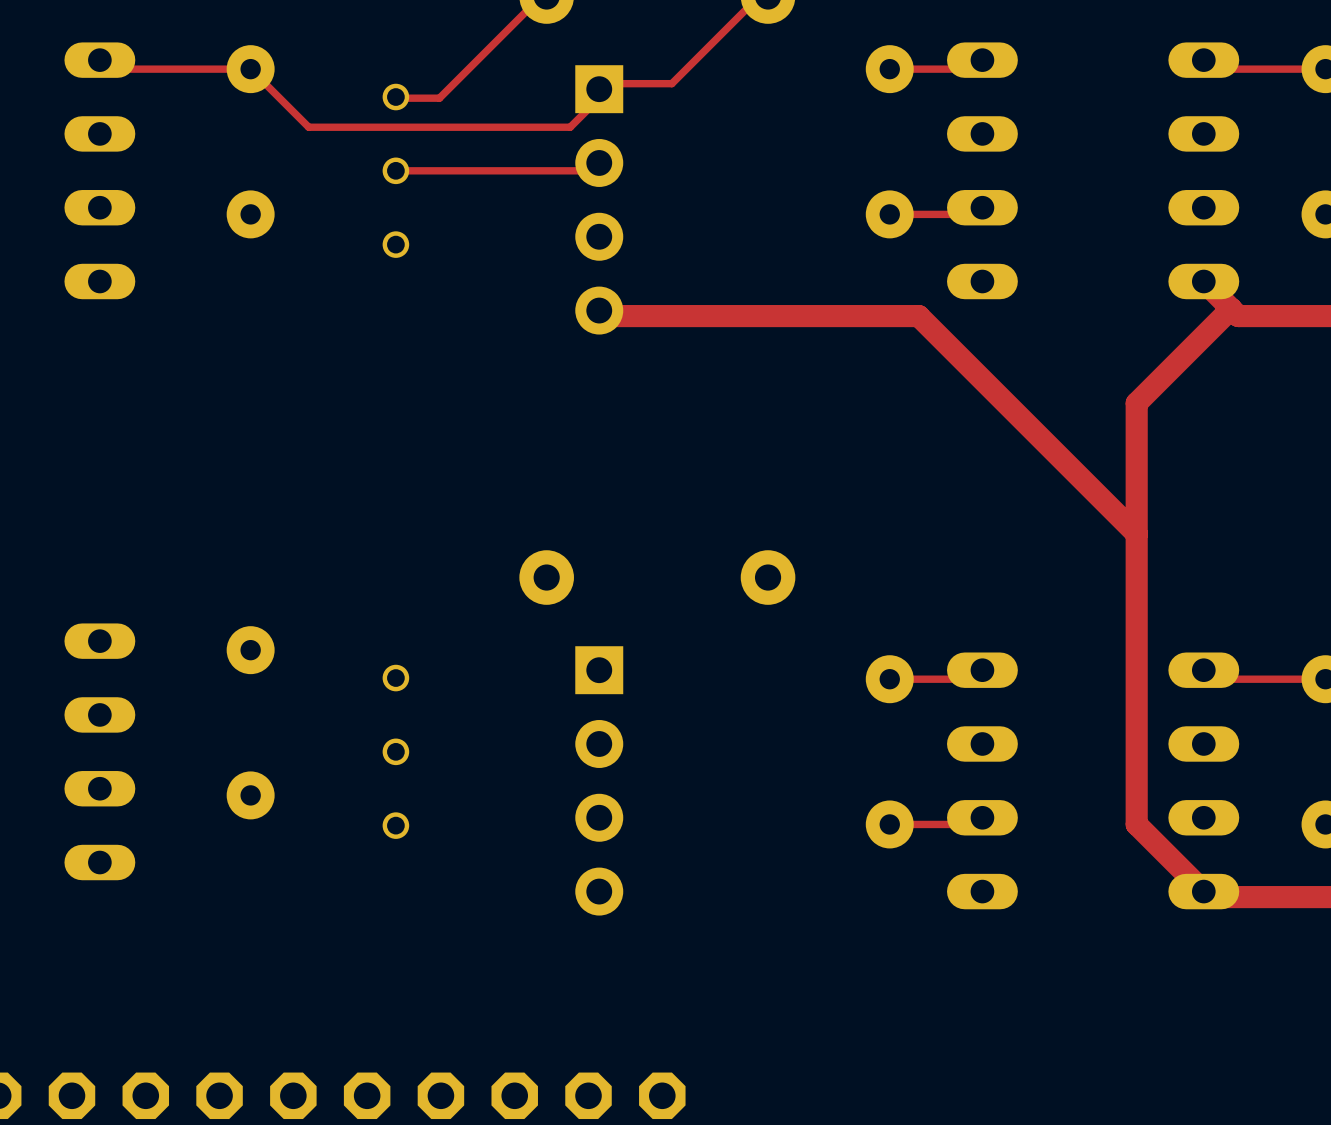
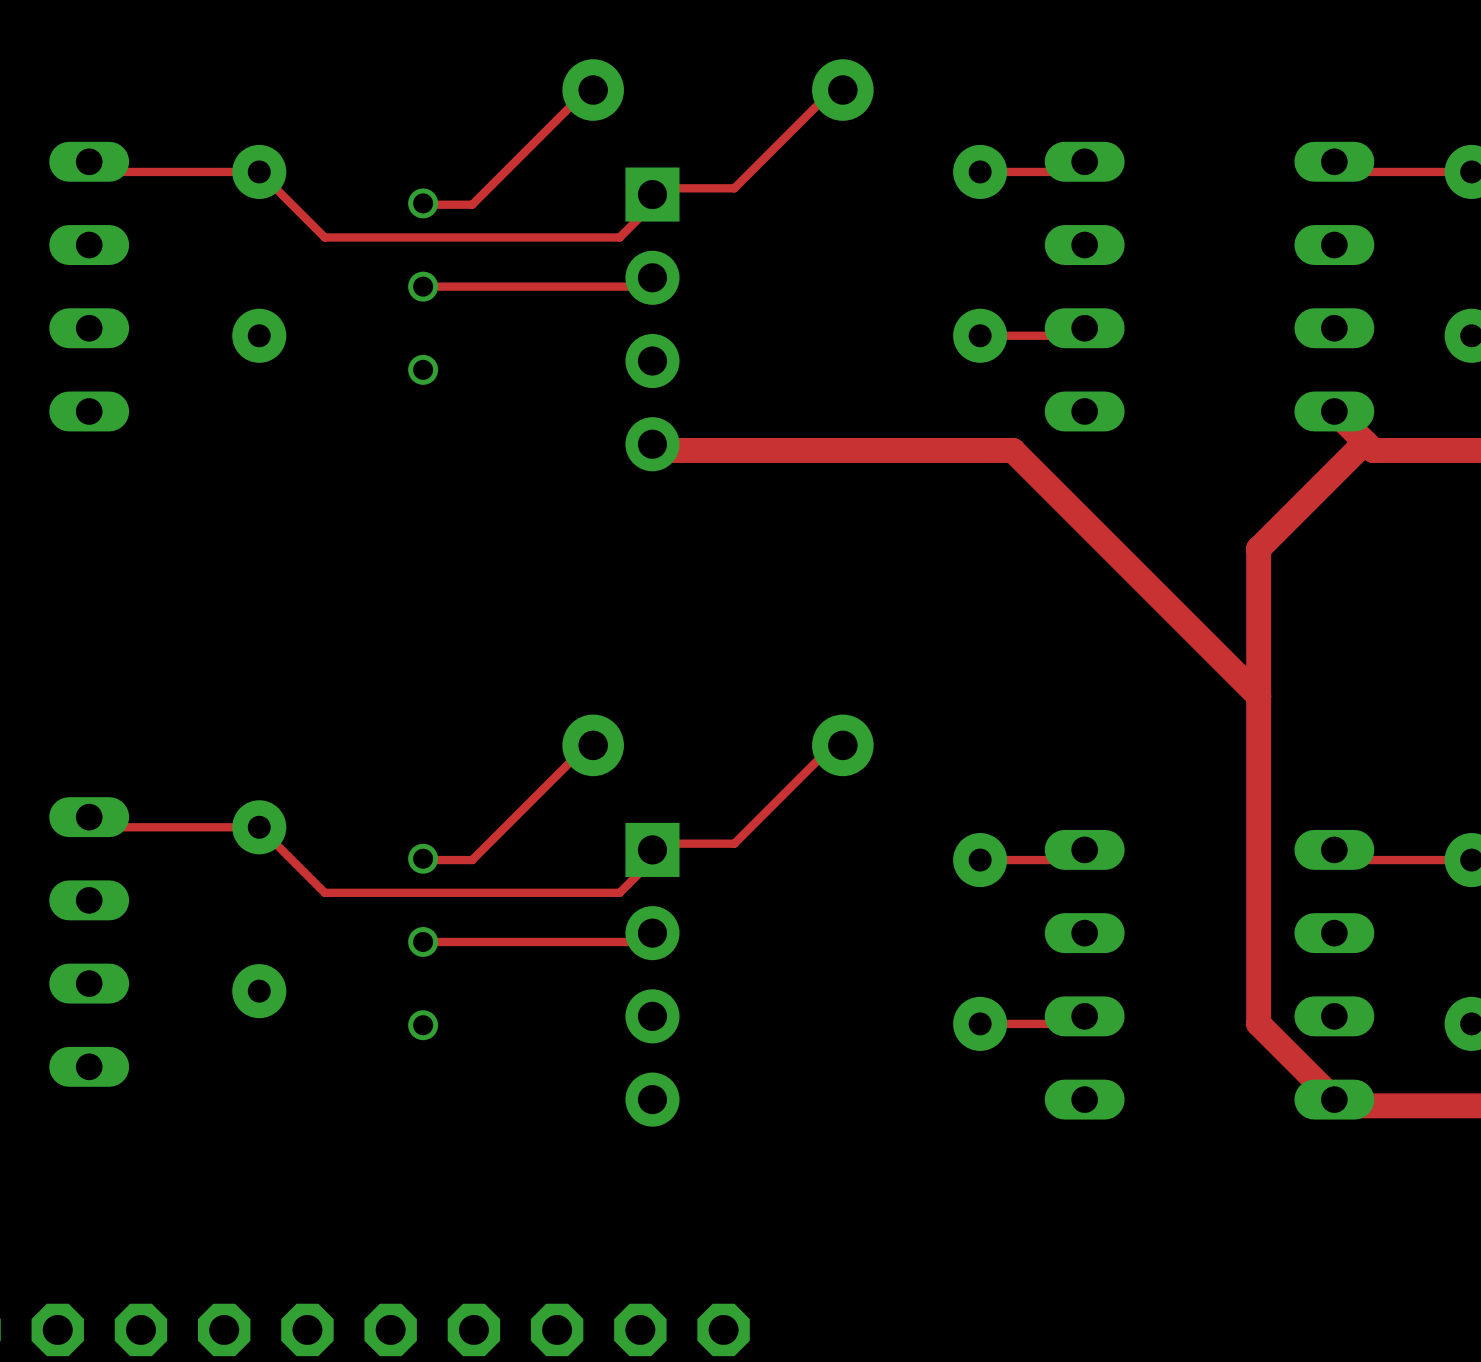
top track: none -> (593, 745) (586, 745) (472, 860) (423, 858)
top track: none -> (842, 745) (832, 745) (734, 843) (652, 843) (652, 860) (619, 892) (324, 892) (259, 827) (95, 827) (89, 817)
top track: none -> (652, 933) (652, 941) (423, 941)

